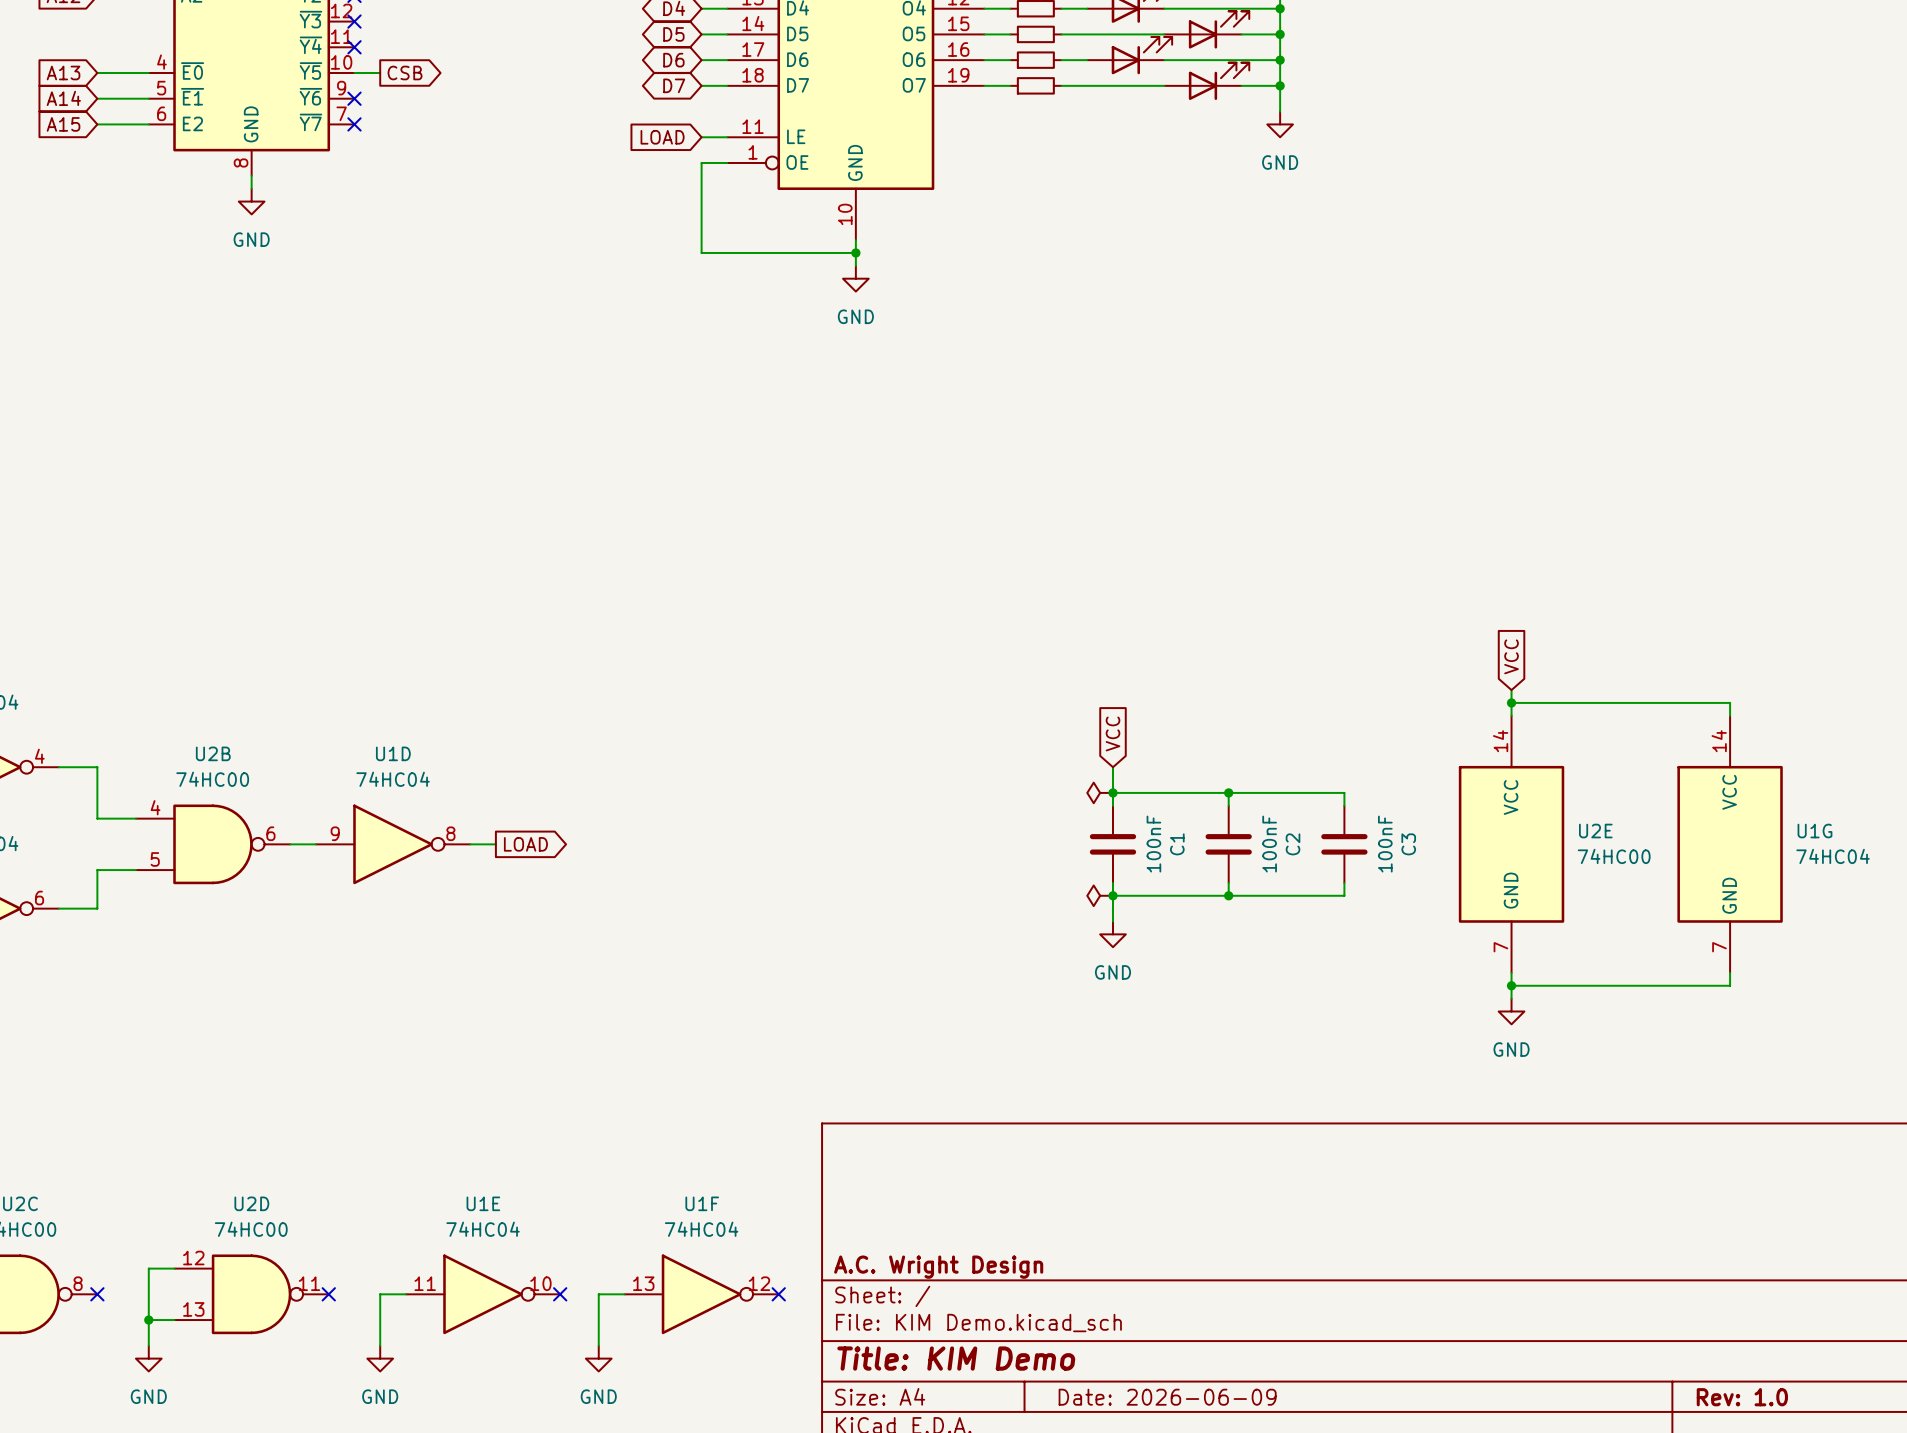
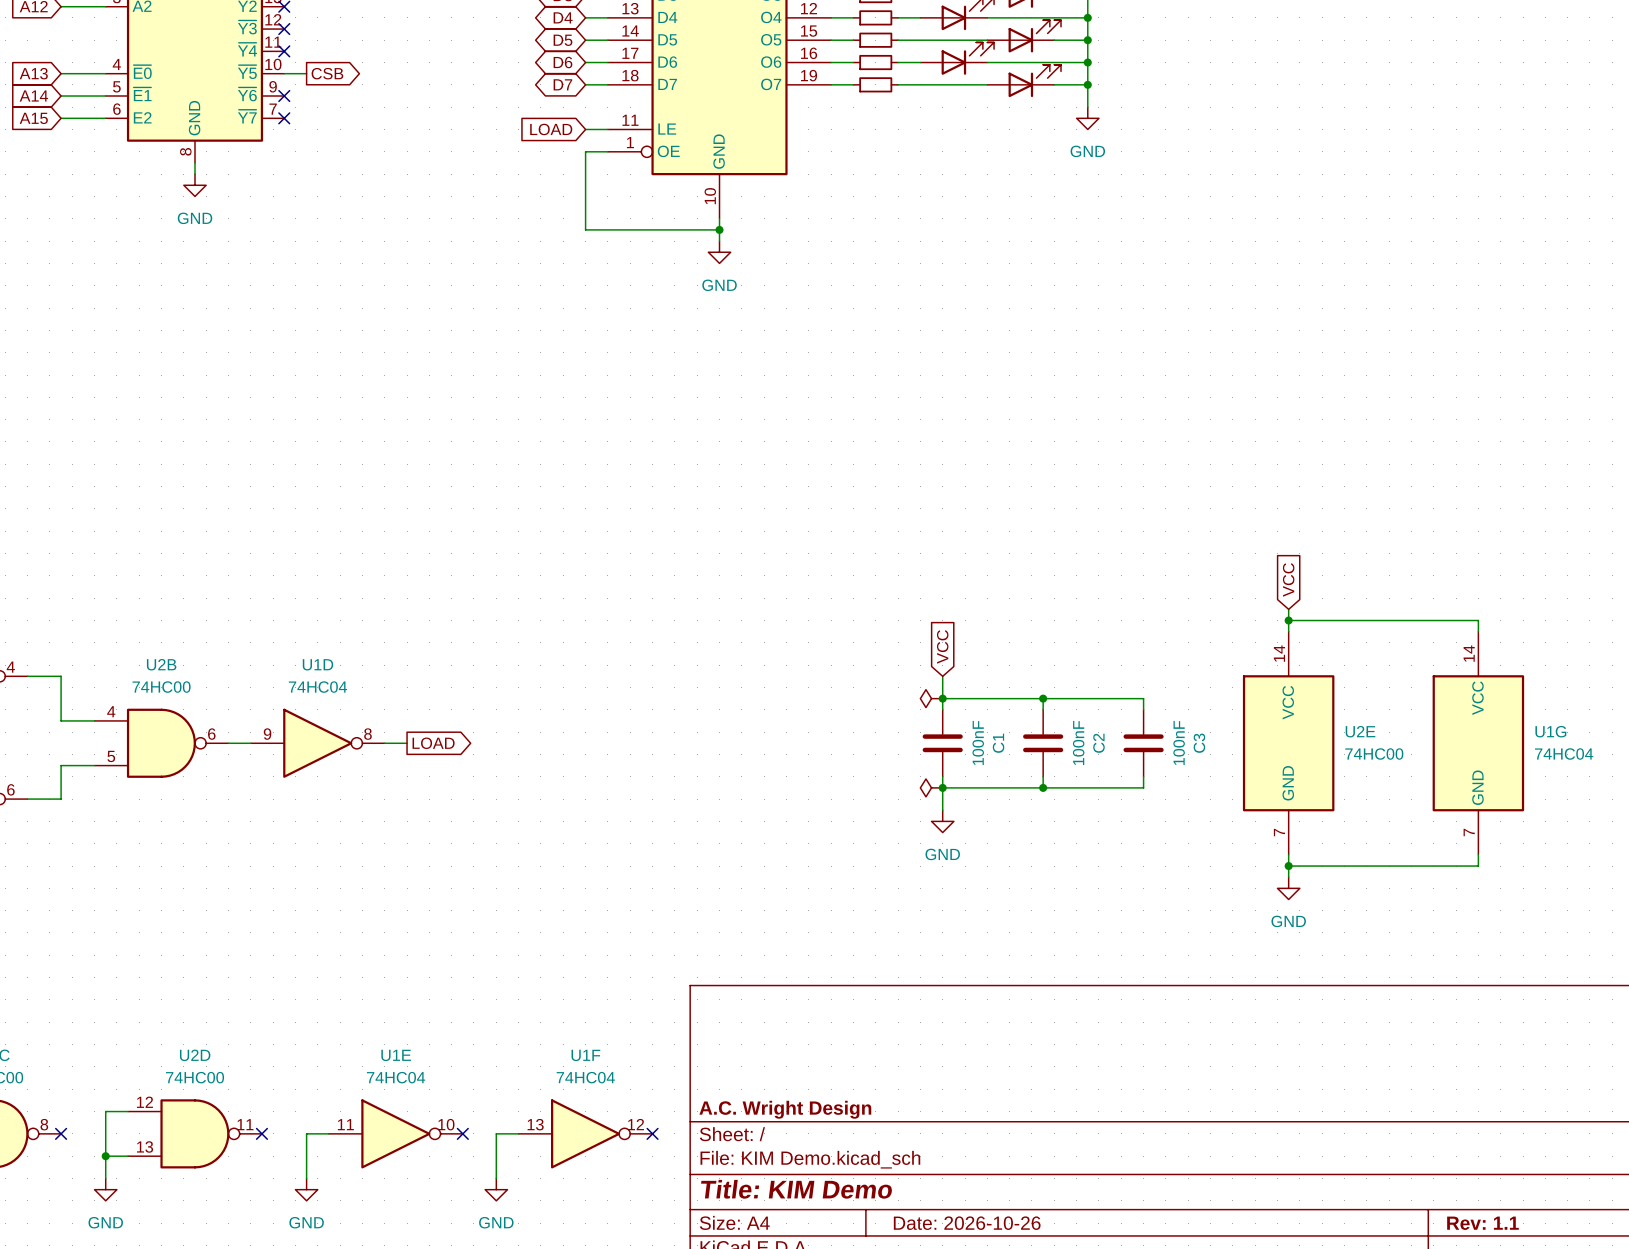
title block: Date: 2026-06-09 (1167, 1397) -> Date: 2026-10-26 (967, 1223)
title block: Rev: 1.0 (1742, 1397) -> Rev: 1.1 (1482, 1223)

